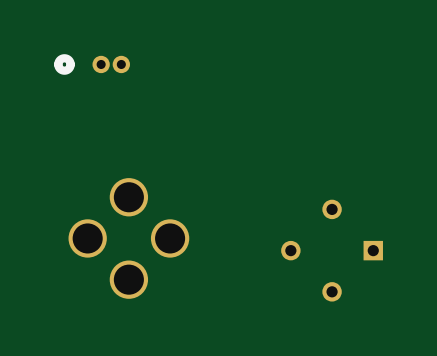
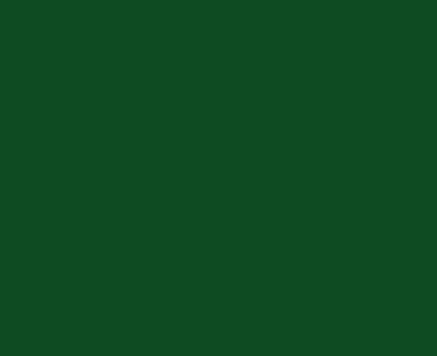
part: (92, 64) -> none
part: (128, 238) -> none
part: (332, 250) -> none

